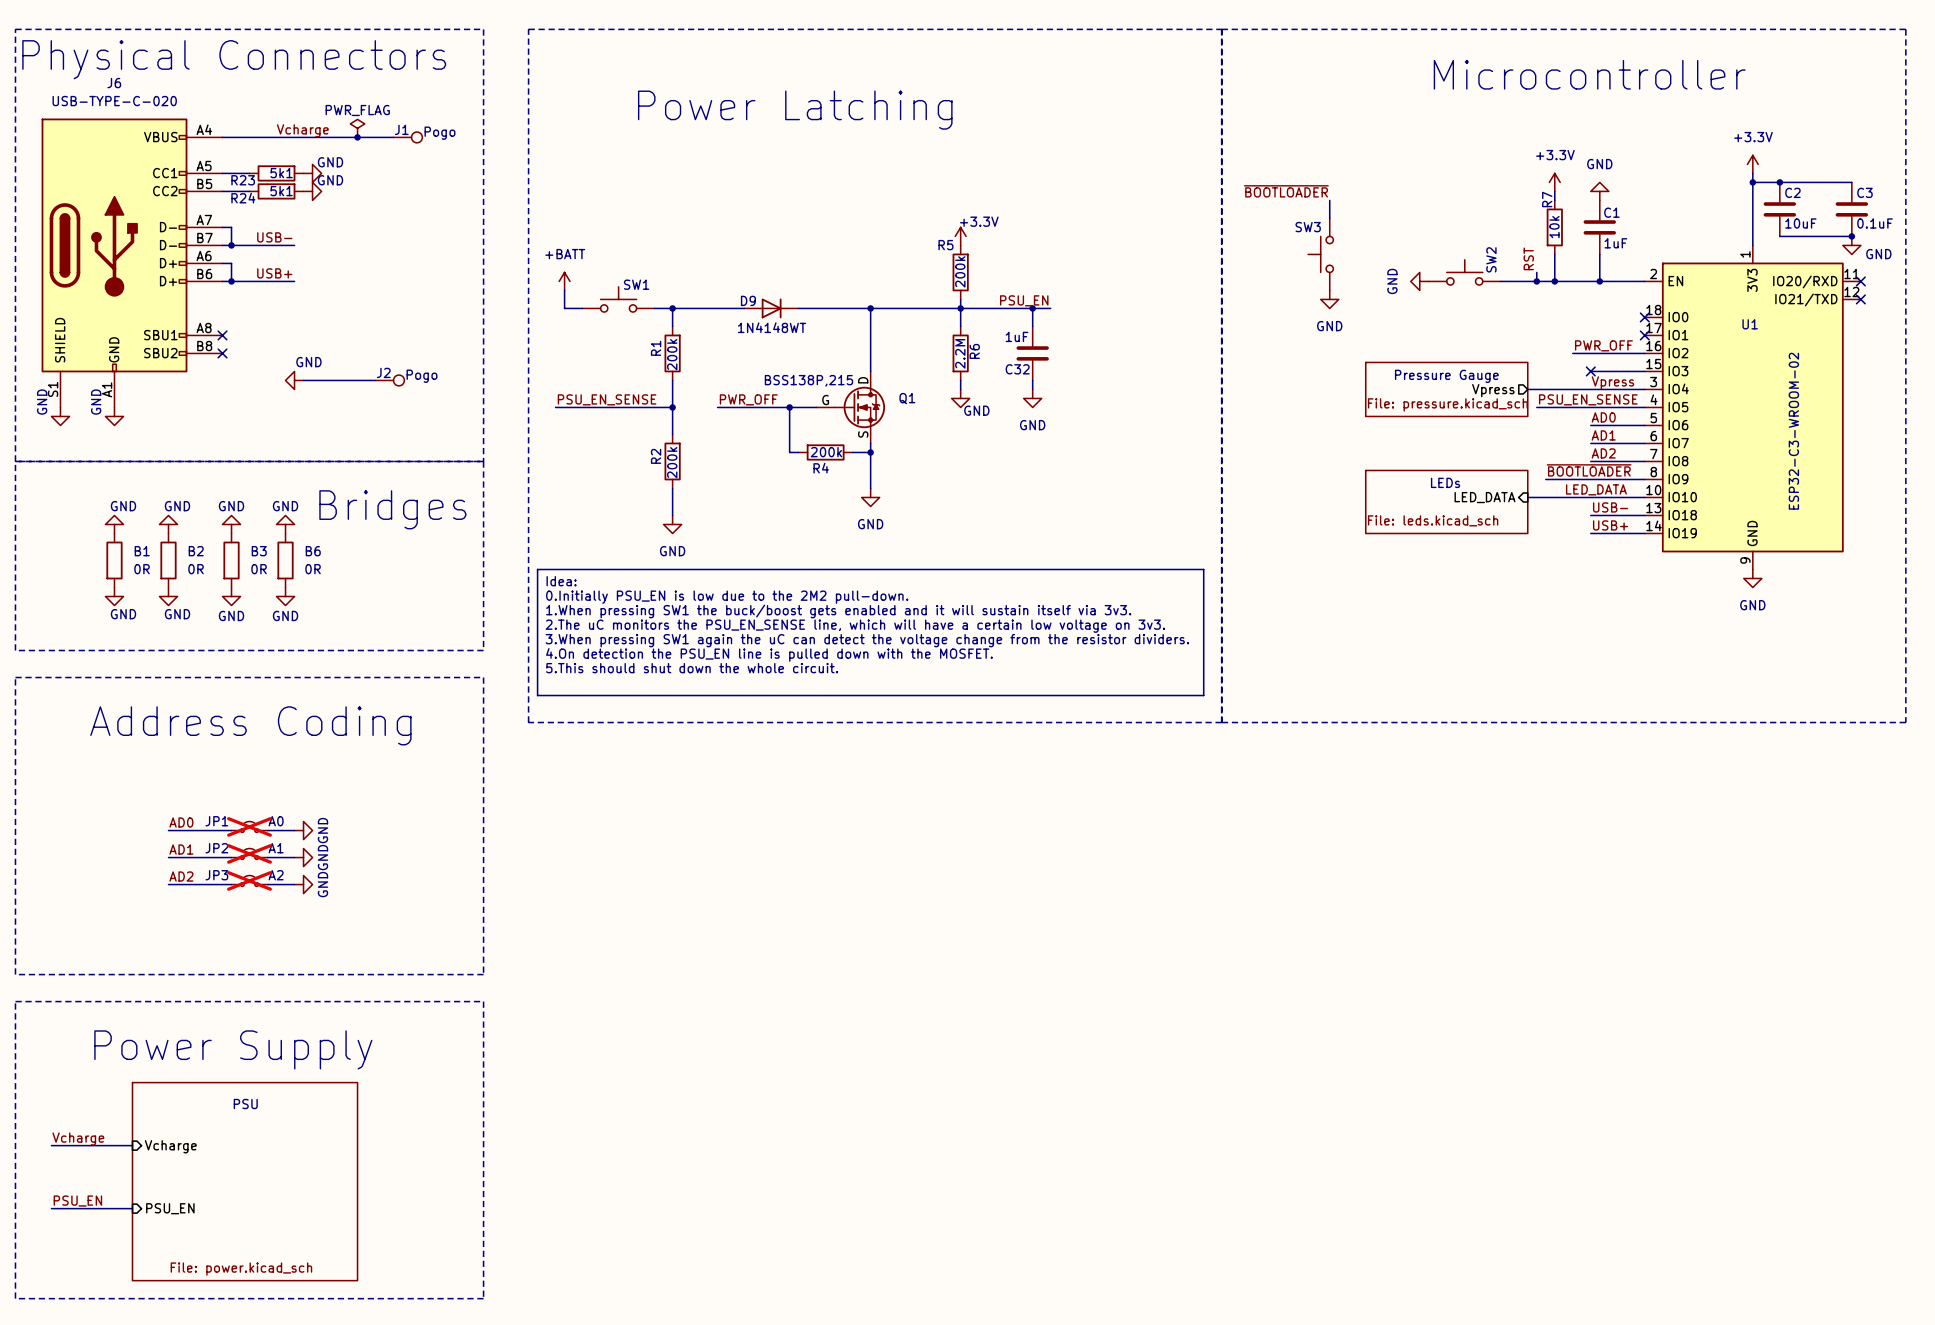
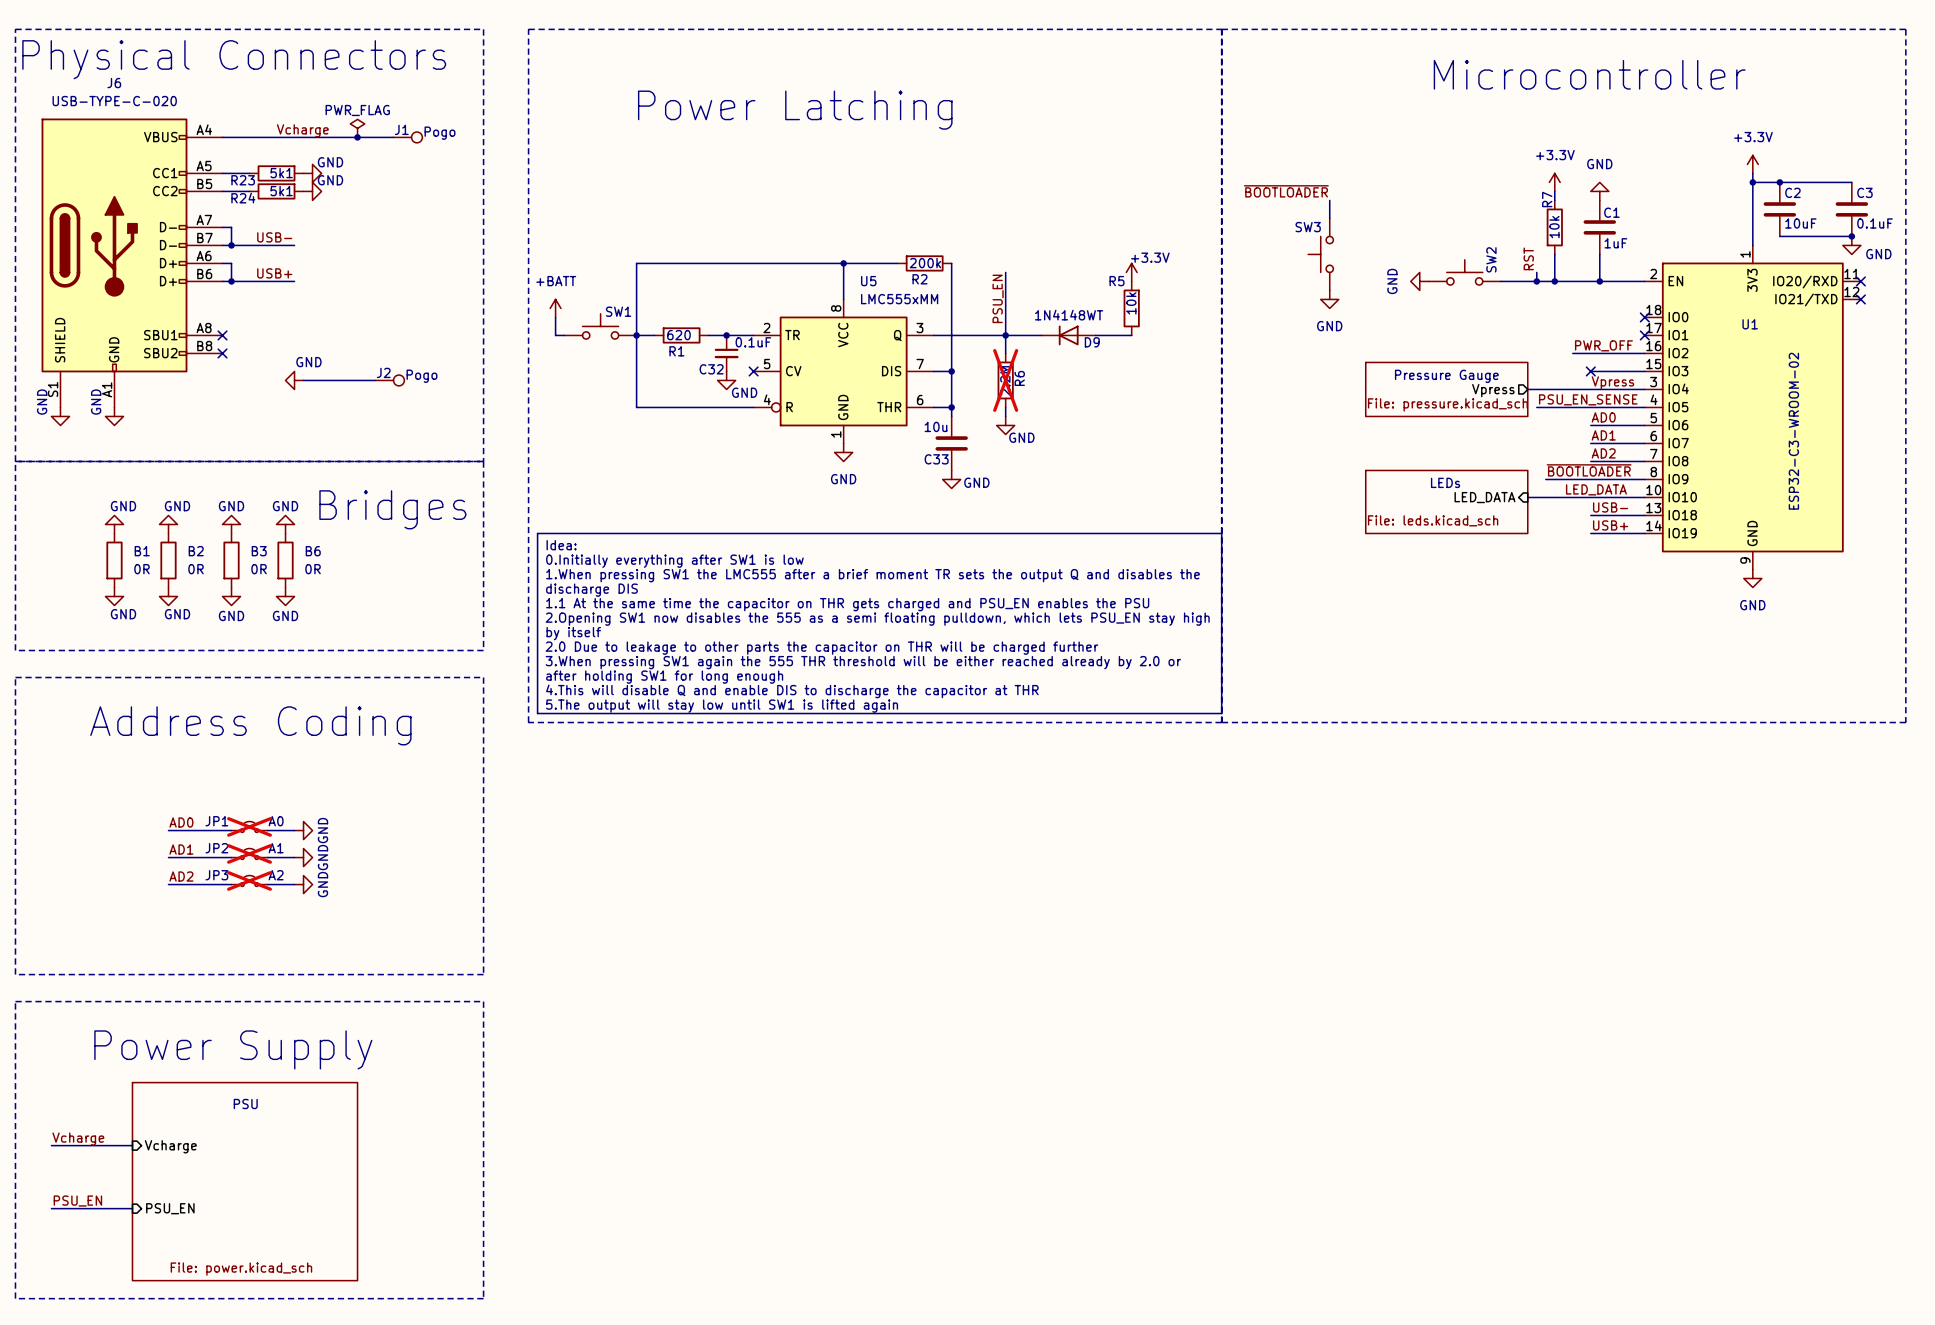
power symbol position: +3.3V (960, 236) -> +3.3V (1131, 272)
wire: none -> (843, 263) (843, 299)
junction: none -> (843, 263)
wire: none -> (951, 263) (951, 416)
R5 value: 200k (960, 271) -> 10k (1131, 303)
R5 position: (960, 272) -> (1131, 308)
wire: none -> (1005, 272) (1005, 353)
power symbol position: +BATT (564, 281) -> +BATT (555, 308)
wire: (564, 290) (564, 308) (582, 308) -> none
SW1 position: (618, 299) -> (600, 326)
wire: (960, 299) (960, 326) -> none
label rotation: 0° (1024, 300) -> 90° counterclockwise (998, 298)
wire: (654, 308) (744, 308) -> none
wire: (672, 308) (672, 326) -> none
junction: (672, 308) -> none
D9 rotation: 0° (771, 308) -> 180° (1068, 335)
D9 position: (771, 308) -> (1068, 335)
wire: (798, 308) (1050, 308) -> none
junction: (870, 308) -> none
junction: (960, 308) -> none
wire: (1032, 308) (1032, 326) -> none
junction: (1032, 308) -> none
wire: none -> (555, 317) (555, 335) (564, 335)
C32 symbol: [1016, 326, 1049, 381] -> [714, 335, 739, 372]
wire: none -> (636, 335) (654, 335)
junction: none -> (636, 335)
wire: none -> (708, 335) (753, 335)
junction: none -> (726, 335)
wire: none -> (933, 335) (1041, 335)
junction: none -> (1005, 335)
wire: none -> (1095, 335) (1131, 335)
C32 value: 1uF (1017, 336) -> 0.1uF (753, 342)
R1 name position: R1 (656, 348) -> R1 (676, 351)
R1 rotation: 0° (672, 353) -> 90° clockwise (681, 335)
R6 position: (960, 353) -> (1005, 380)
R1 value: 200k (672, 354) -> 620 (678, 335)
no-connect mark: none -> (753, 371)
U5: none -> LMC555xMM (843, 371)
wire: none -> (933, 371) (951, 371)
junction: none -> (951, 371)
wire: (672, 380) (672, 434) -> none
power symbol: none -> GND (726, 380)
wire: (960, 380) (960, 389) -> none
R6 do-not-place cross: none -> (1005, 380)
wire: (1032, 380) (1032, 389) -> (1005, 407) (1005, 416)
power symbol: GND (960, 398) -> none
power symbol: GND (1032, 398) -> none
label: PSU_EN_SENSE (607, 399) -> none
label: PWR_OFF (748, 399) -> none
wire: (555, 407) (636, 407) -> (897, 263) (636, 263) (636, 407)
wire: none -> (672, 407) (717, 407)
junction: (672, 407) -> none
wire: (789, 407) (789, 452) (798, 452) -> none
junction: (789, 407) -> none
Q1: BSS138P,215 (850, 407) -> none
junction: none -> (951, 407)
power symbol: none -> GND (1005, 425)
wire: (870, 443) (870, 488) -> none
C33: none -> 10u (951, 443)
R4: 200k (825, 452) -> none
power symbol: none -> GND (843, 452)
wire: (852, 452) (870, 452) -> (933, 407) (951, 407)
junction: (870, 452) -> none
R2 name position: R2 (656, 456) -> R2 (919, 279)
R2 rotation: 0° (672, 461) -> 90° clockwise (924, 263)
R2 position: (672, 461) -> (924, 263)
power symbol: none -> GND (951, 479)
wire: (672, 488) (672, 515) -> none
power symbol: GND (870, 497) -> none
power symbol: GND (672, 524) -> none
text: none -> 0.Initially everything after SW1 is low (674, 561)
line: (537, 569) (1203, 569) (1203, 695) (537, 695) -> (537, 569) (537, 533) (1221, 533) (1221, 713) (537, 713) (537, 695)
text: none -> 1.When pressing SW1 the LMC555 after a brief moment TR sets the output Q and disables the (872, 575)
text position: Idea: (561, 581) -> Idea: (561, 545)
text: none -> discharge DIS (591, 590)
text: 0.Initially PSU_EN is low due to the 2M2 pull-down. (727, 597) -> none
text: none -> 1.1 At the same time the capacitor on THR gets charged and PSU_EN enables the PSU (847, 604)
text: 1.When pressing SW1 the buck/boost gets enabled and it will sustain itself via 3v3. (838, 611) -> none
text: none -> 2.Opening SW1 now disables the 555 as a semi floating pulldown, which lets PSU_EN stay high (877, 619)
text: 2.The uC monitors the PSU_EN_SENSE line, which will have a certain low voltage on 3v3. (855, 626) -> none
text: none -> by itself (573, 633)
text: 3.When pressing SW1 again the uC can detect the voltage change from the resistor dividers. (867, 640) -> none
text: none -> 2.0 Due to leakage to other parts the capacitor on THR will be charged further (821, 648)
text: 4.On detection the PSU_EN line is pulled down with the MOSFET. (769, 654) -> none
text: none -> 3.When pressing SW1 again the 555 THR threshold will be either reached already by 2.0 or (863, 662)
text: 5.This should shut down the whole circuit. (692, 668) -> none
text: none -> after holding SW1 for long enough (664, 677)
text: none -> 4.This will disable Q and enable DIS to discharge the capacitor at THR (792, 691)
text: none -> 5.The output will stay low until SW1 is lifted again (722, 706)

